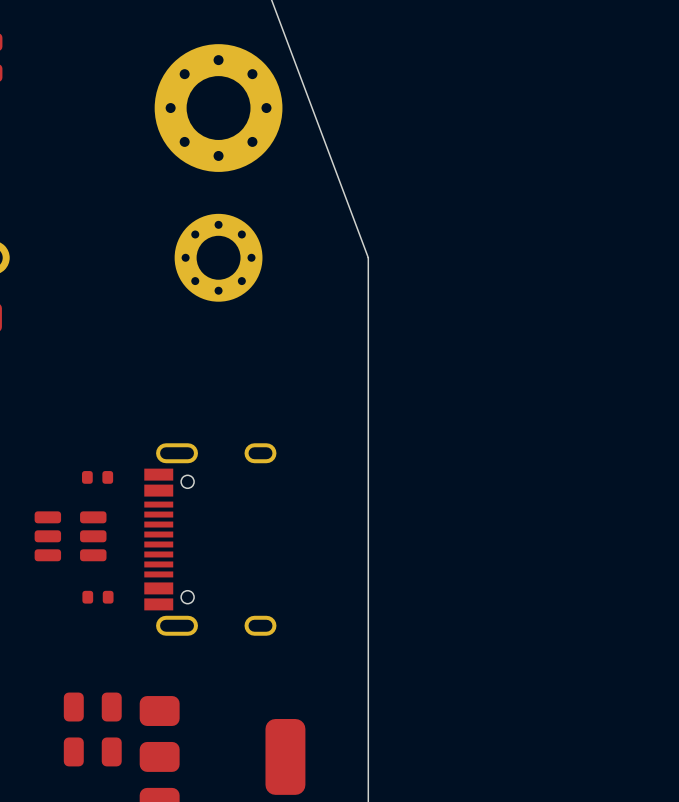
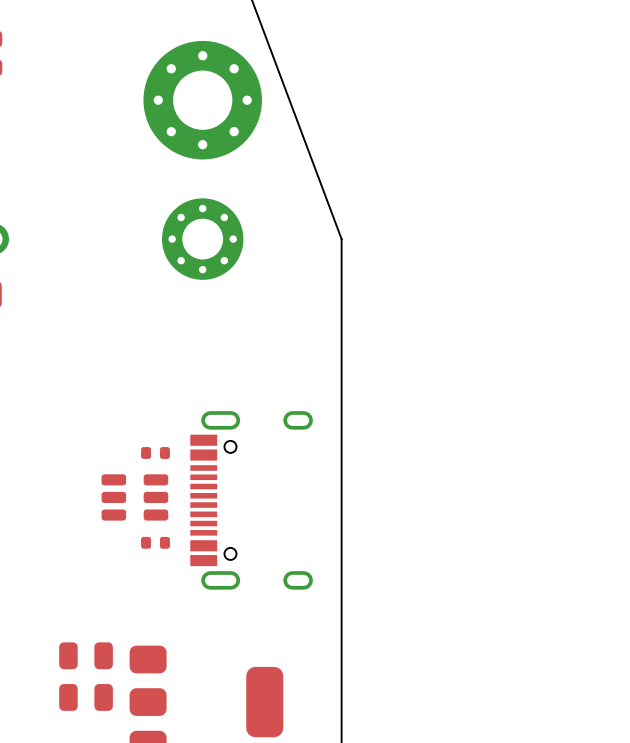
part: (97, 477) -> none
part: none -> (155, 452)
part position: (70, 536) -> (134, 497)
part position: (210, 539) -> (251, 500)
part: none -> (155, 542)
part: (97, 597) -> none

